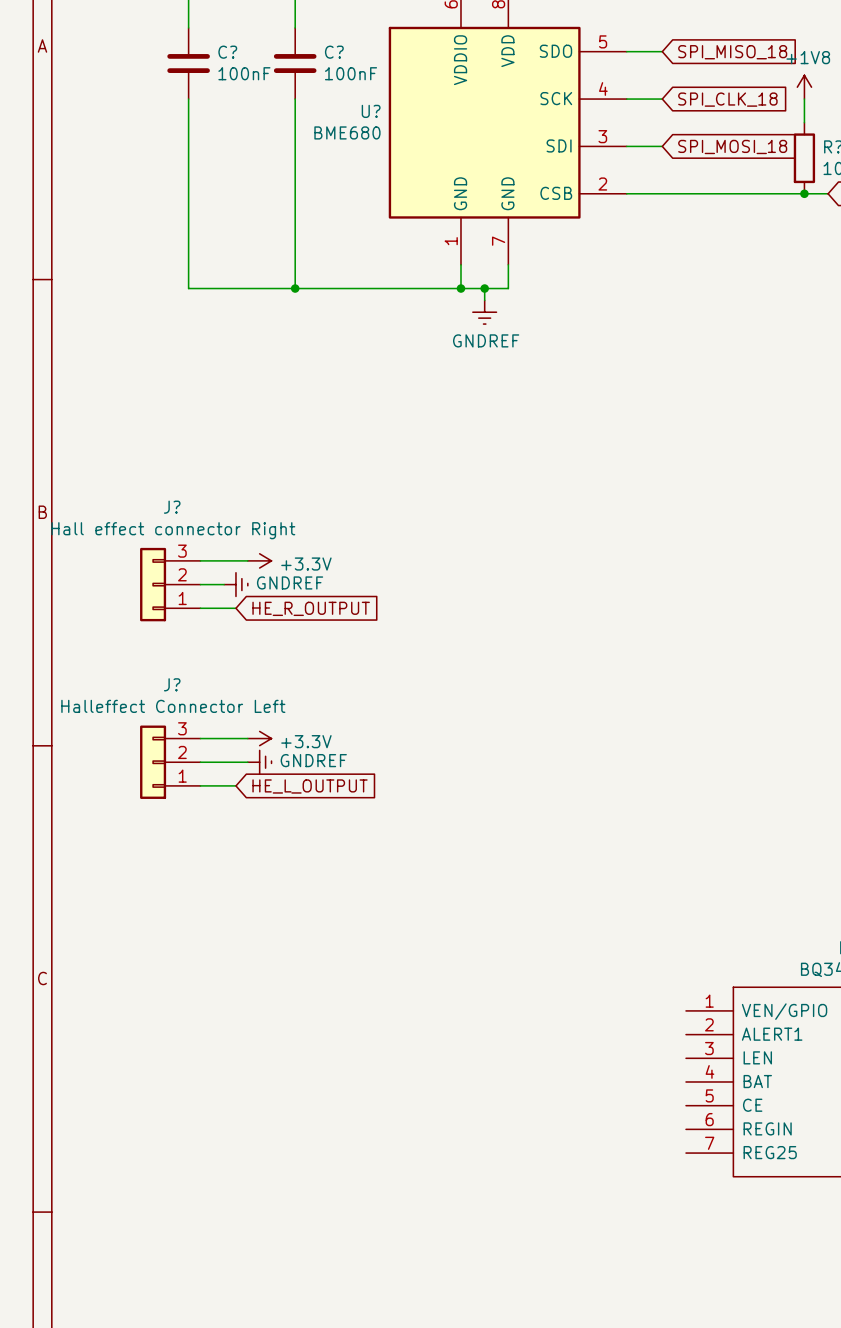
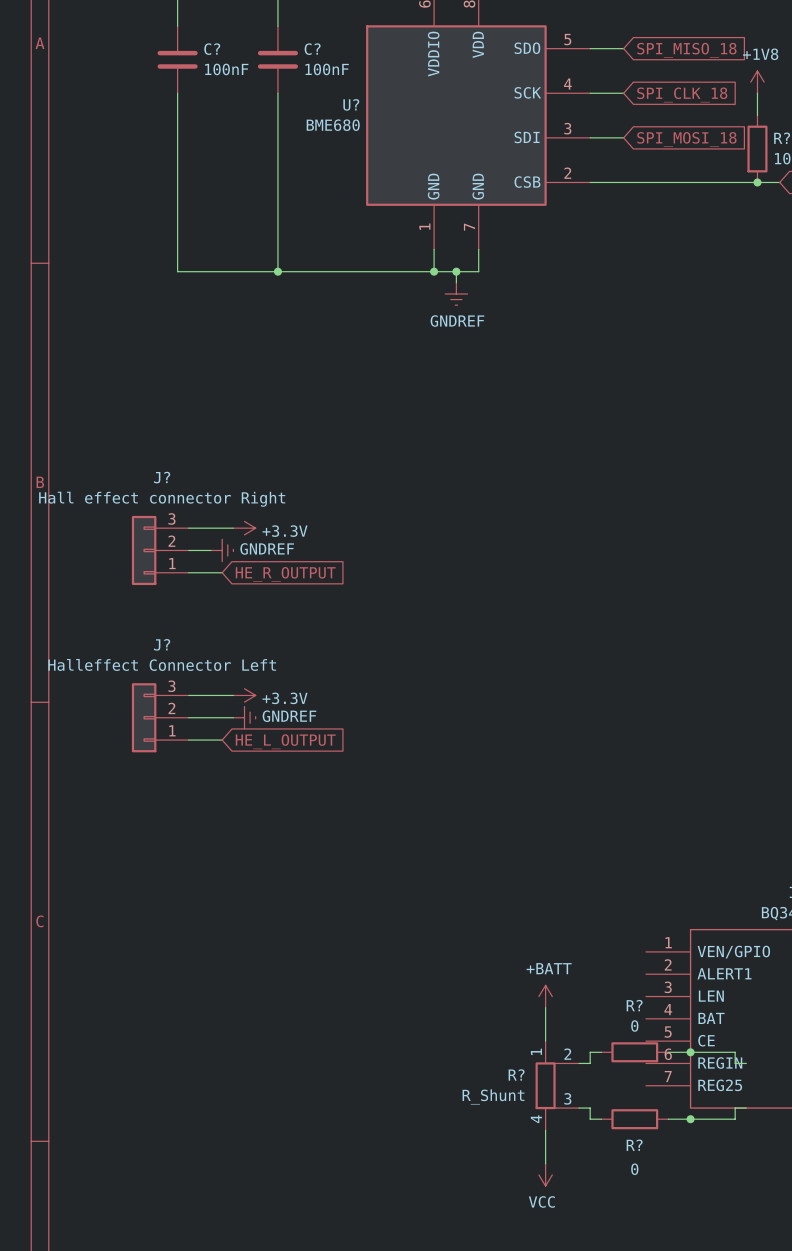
power symbol: none -> +BATT (545, 996)
wire: none -> (545, 1007) (545, 1041)
wire: none -> (601, 1052) (590, 1052) (590, 1063) (579, 1063)
R?: none -> 0 (634, 1052)
wire: none -> (668, 1052) (735, 1052) (735, 1063) (746, 1063)
junction: none -> (690, 1052)
R?: none -> R_Shunt (557, 1085)
wire: none -> (579, 1108) (590, 1108) (590, 1119) (601, 1119)
wire: none -> (746, 1108) (735, 1108) (735, 1119) (668, 1119)
R?: none -> 0 (634, 1119)
junction: none -> (690, 1119)
wire: none -> (545, 1130) (545, 1163)
power symbol: none -> VCC (545, 1174)

